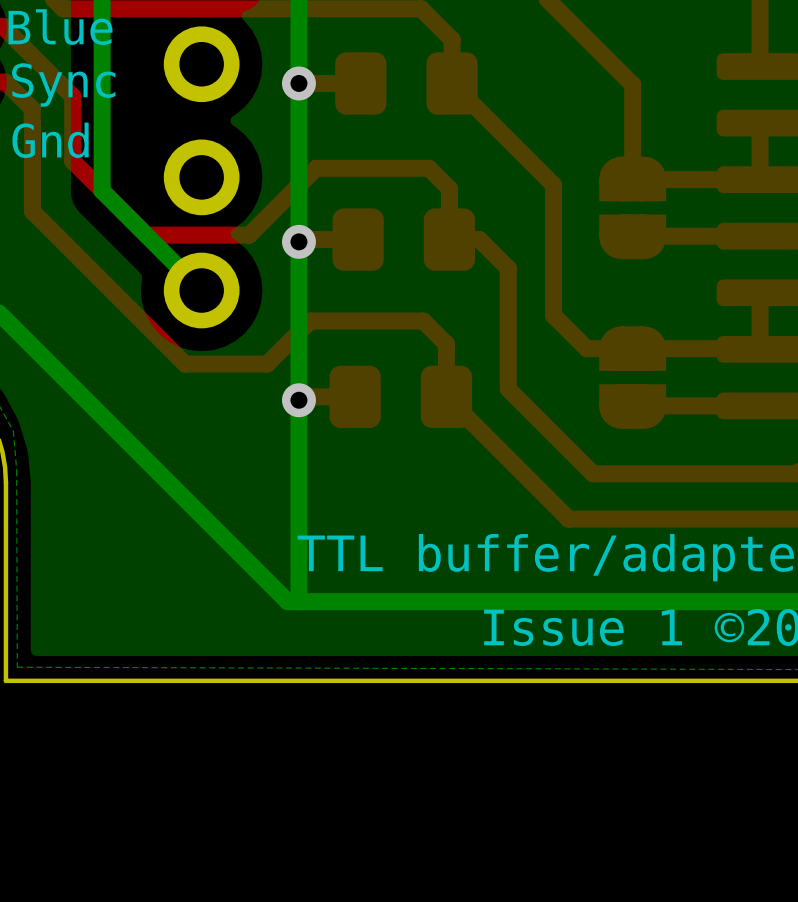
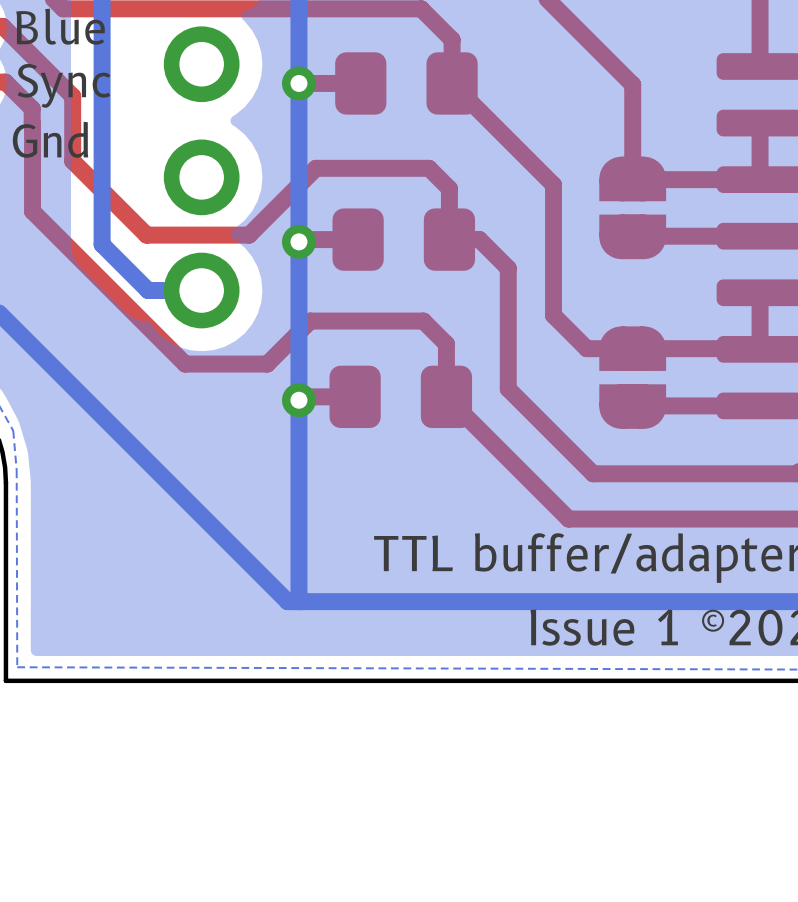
bottom track: (102, 190) (201, 290) -> (102, 190) (102, 244) (148, 290) (201, 290)

